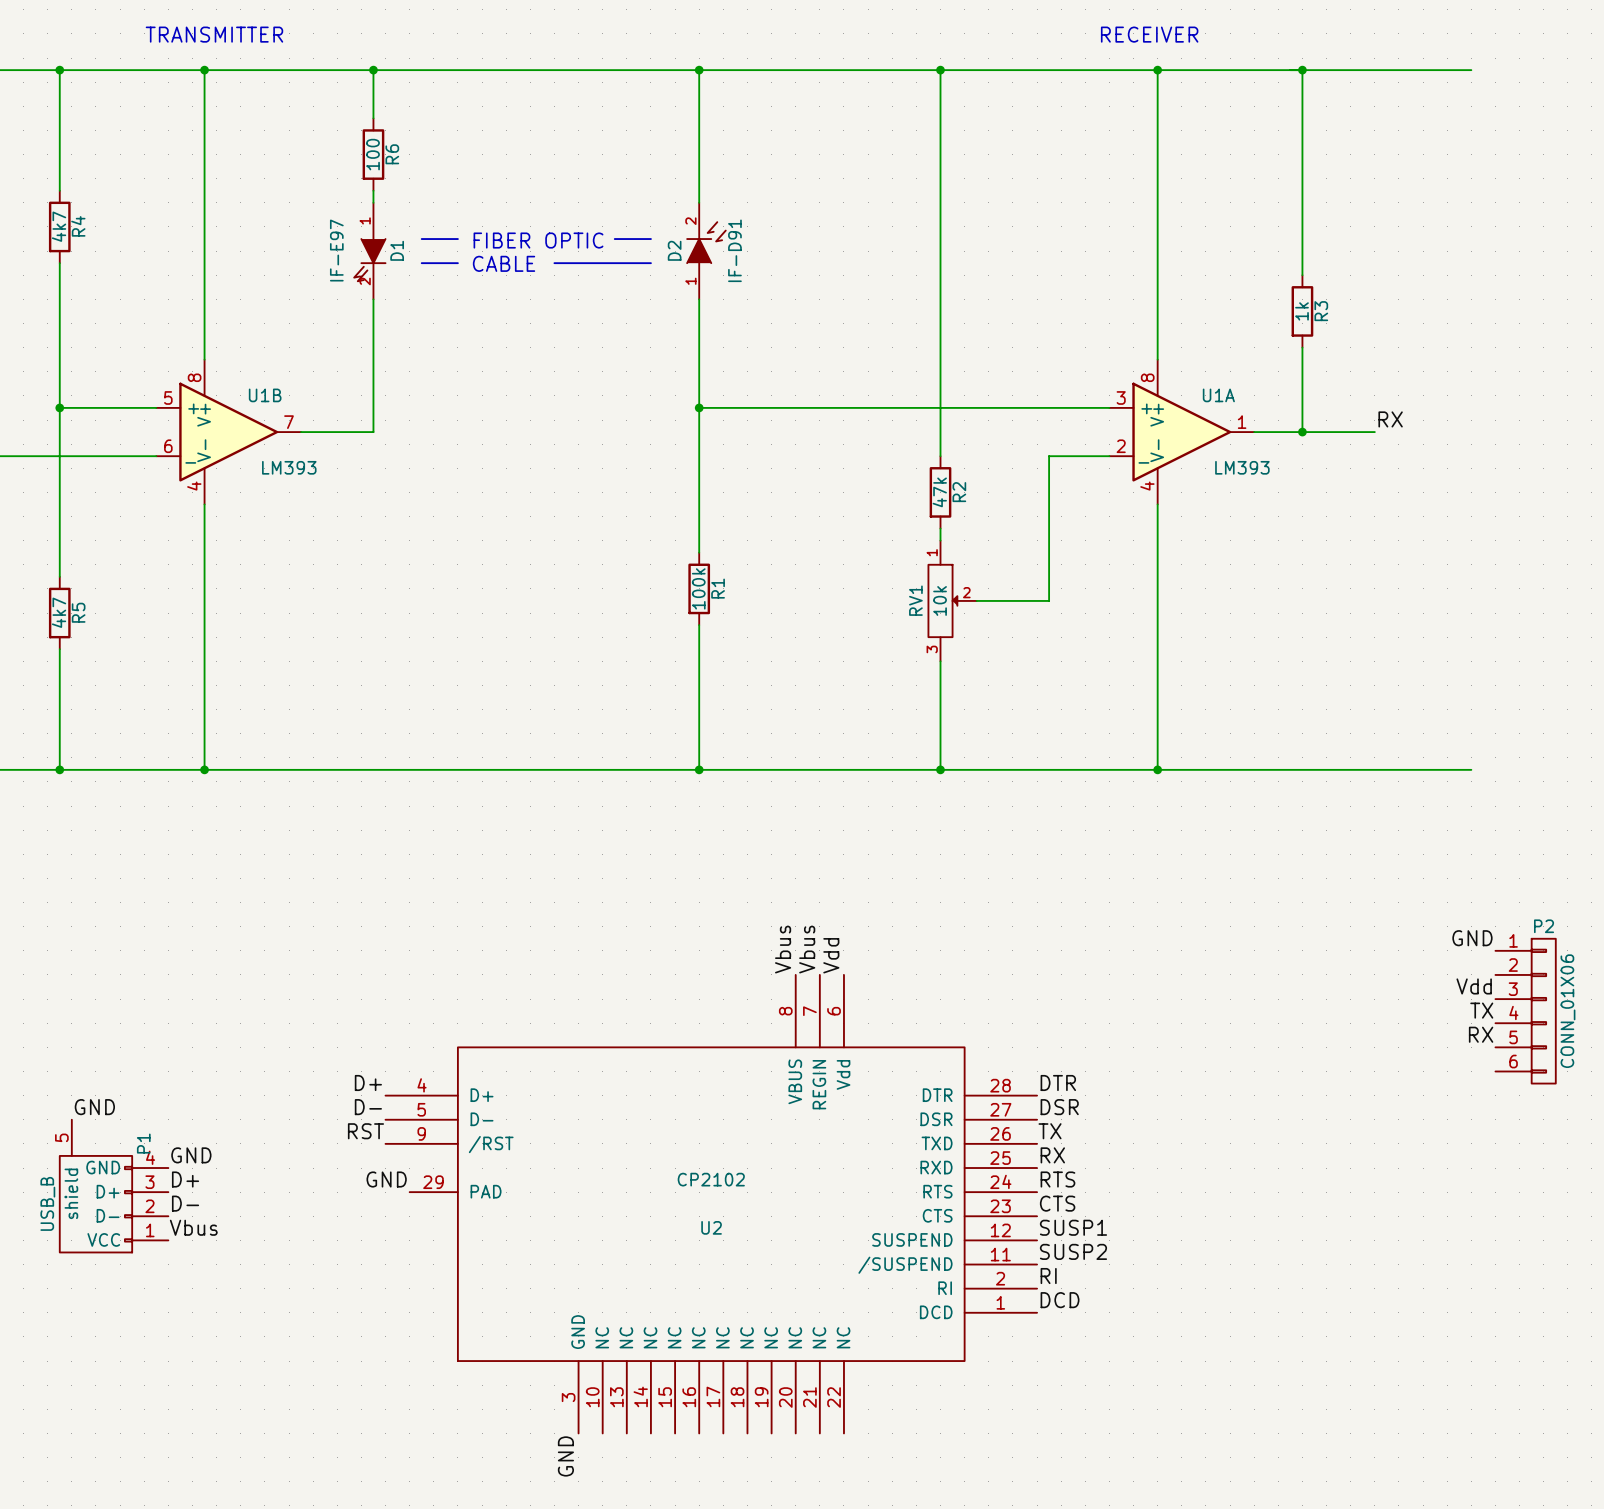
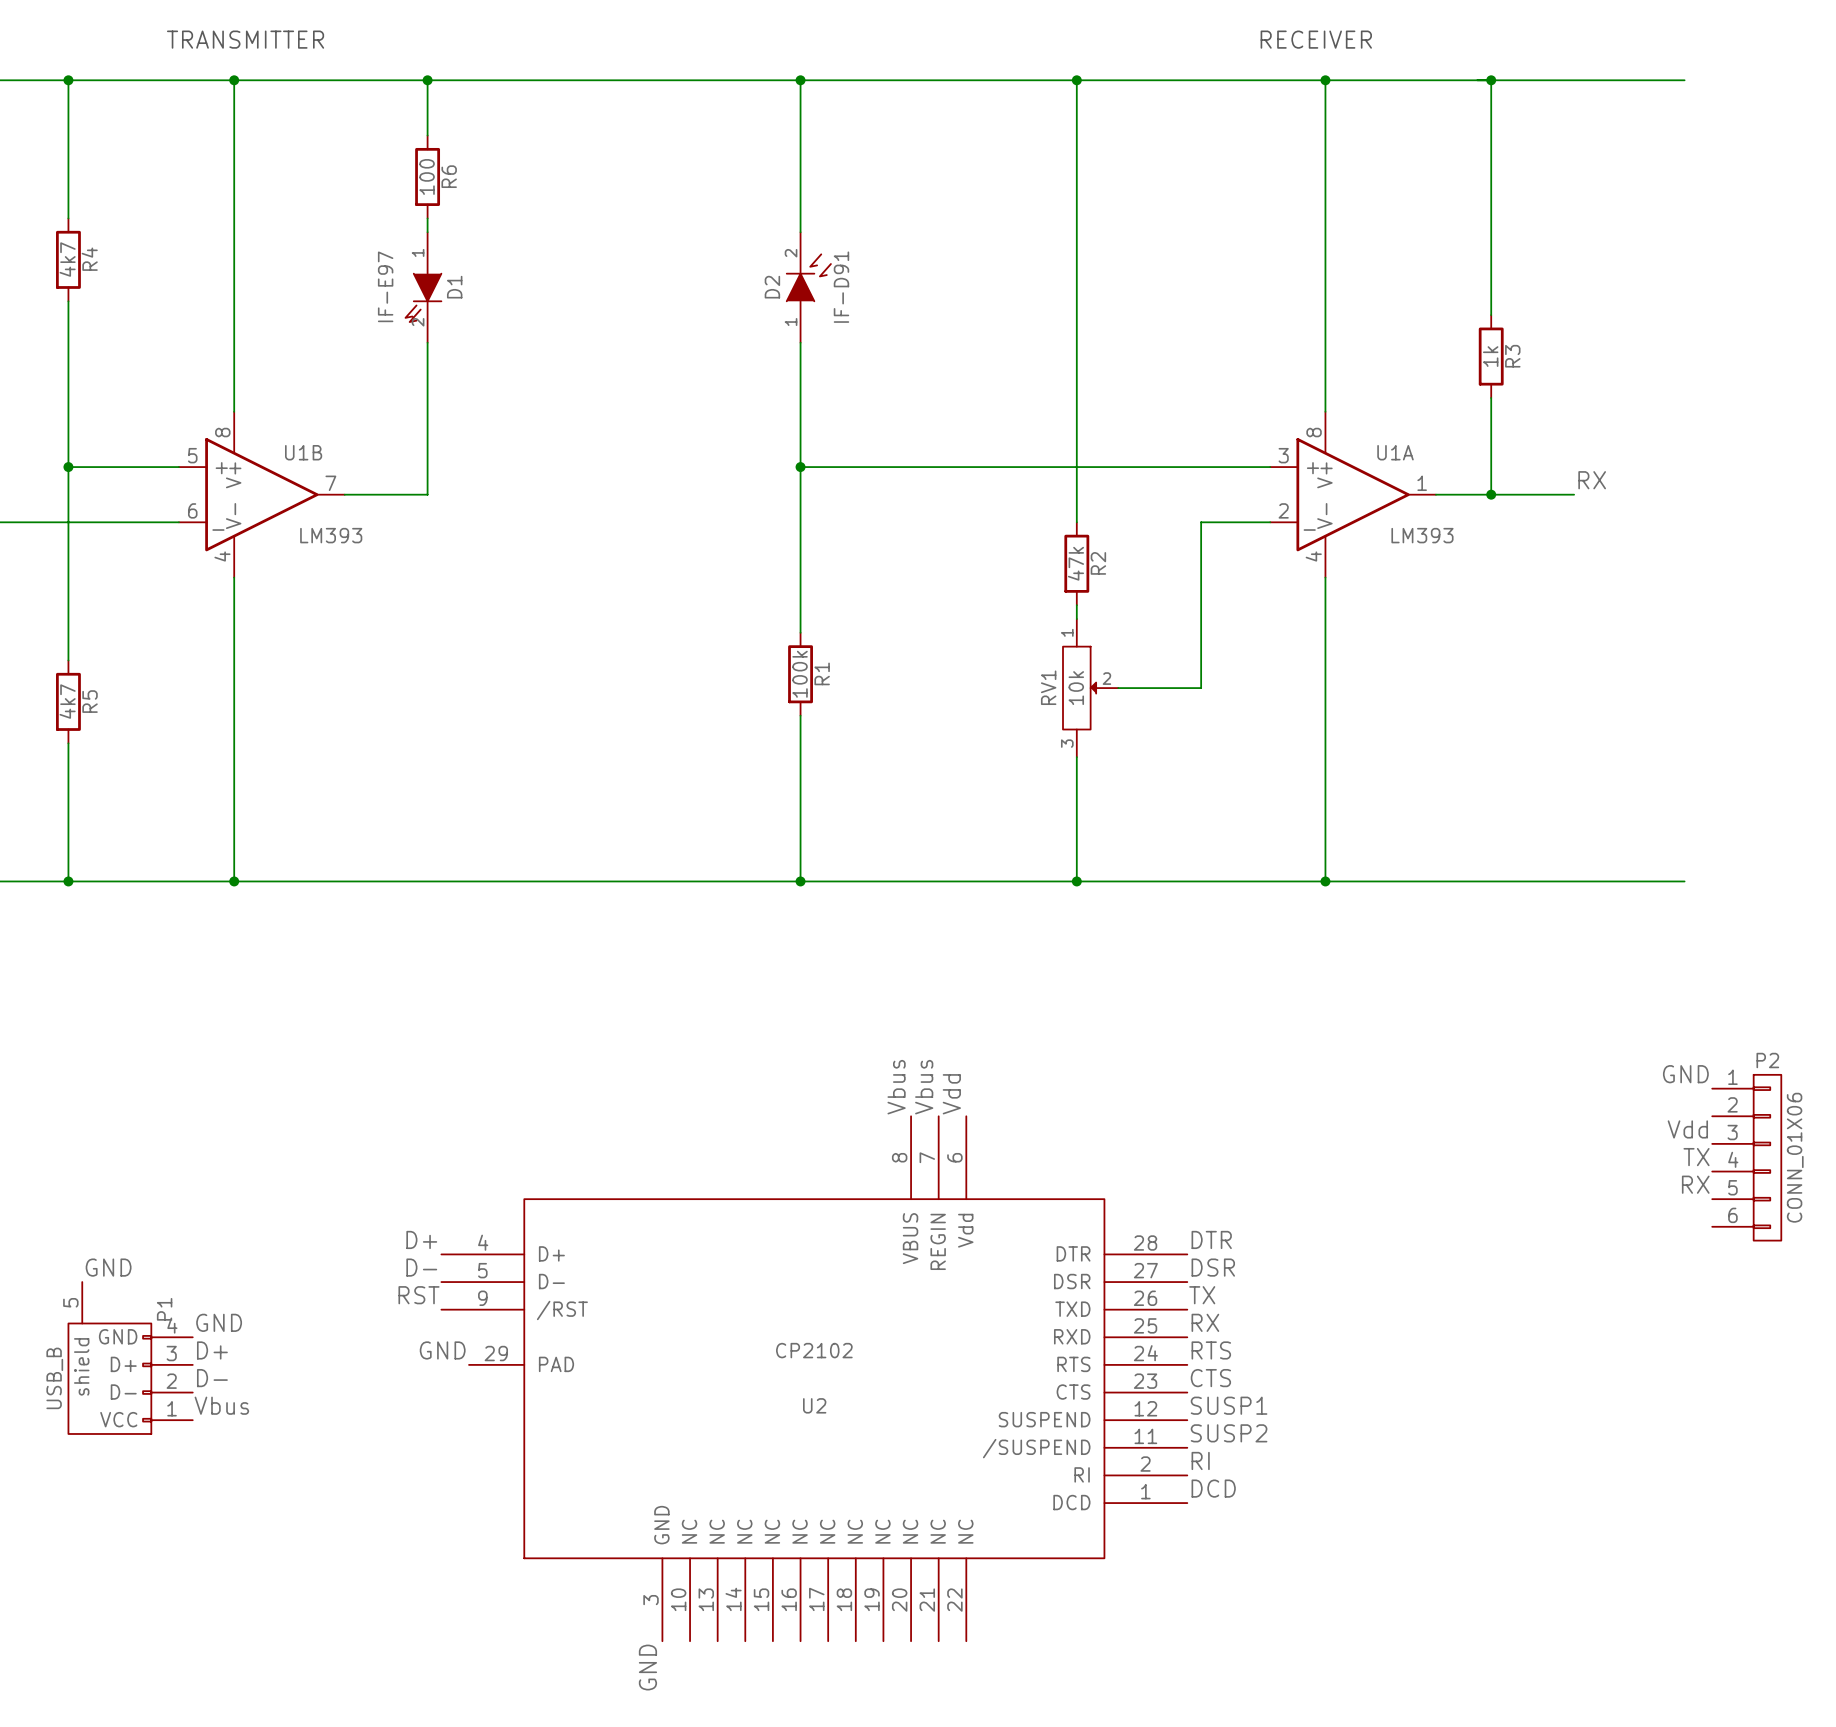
bus: (421, 239) (457, 239) -> none
bus: (614, 239) (650, 239) -> none
text: FIBER OPTIC (538, 240) -> none
bus: (421, 263) (457, 263) -> none
text: CABLE (504, 263) -> none
bus: (554, 263) (650, 263) -> none

